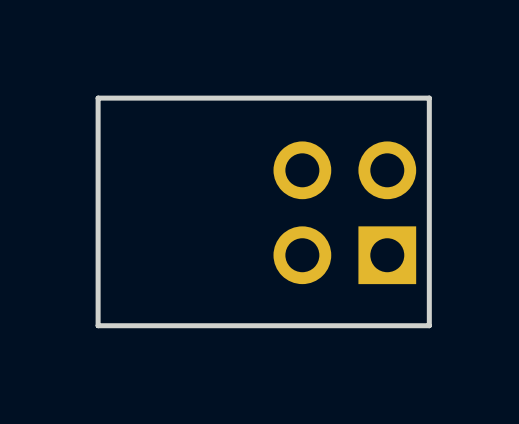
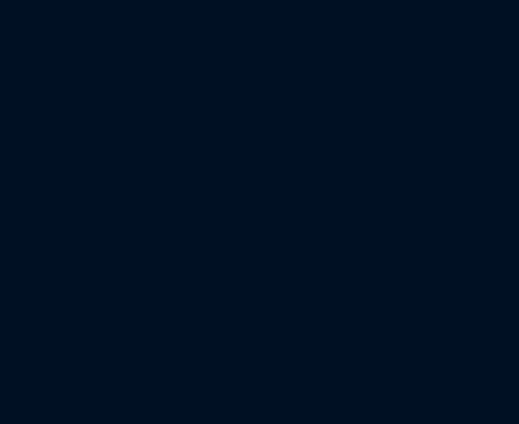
board edge: (429, 98) (98, 98) (98, 325) (429, 325) (429, 98) -> none
part: (344, 212) -> none

